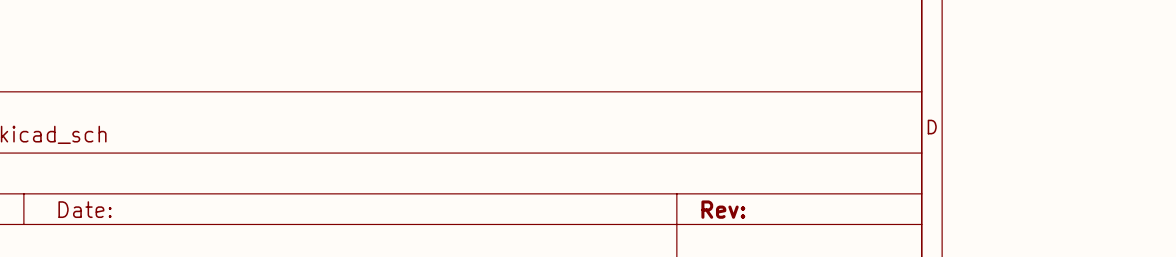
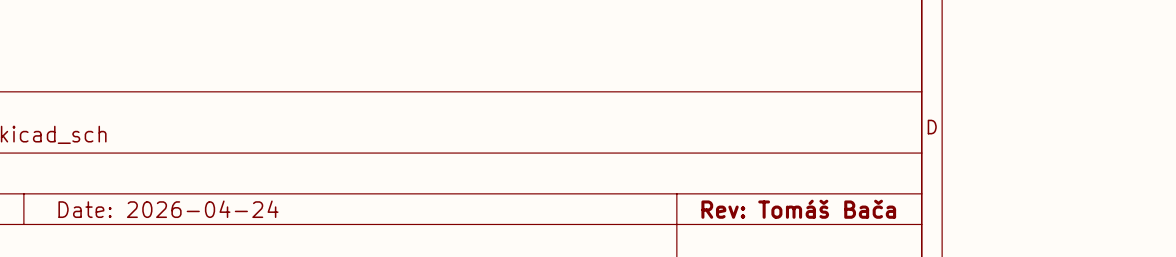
title block: Date: (85, 209) -> Date: 2026-04-24 (168, 209)
title block: Rev: (723, 209) -> Rev: Tomáš Bača (798, 209)

